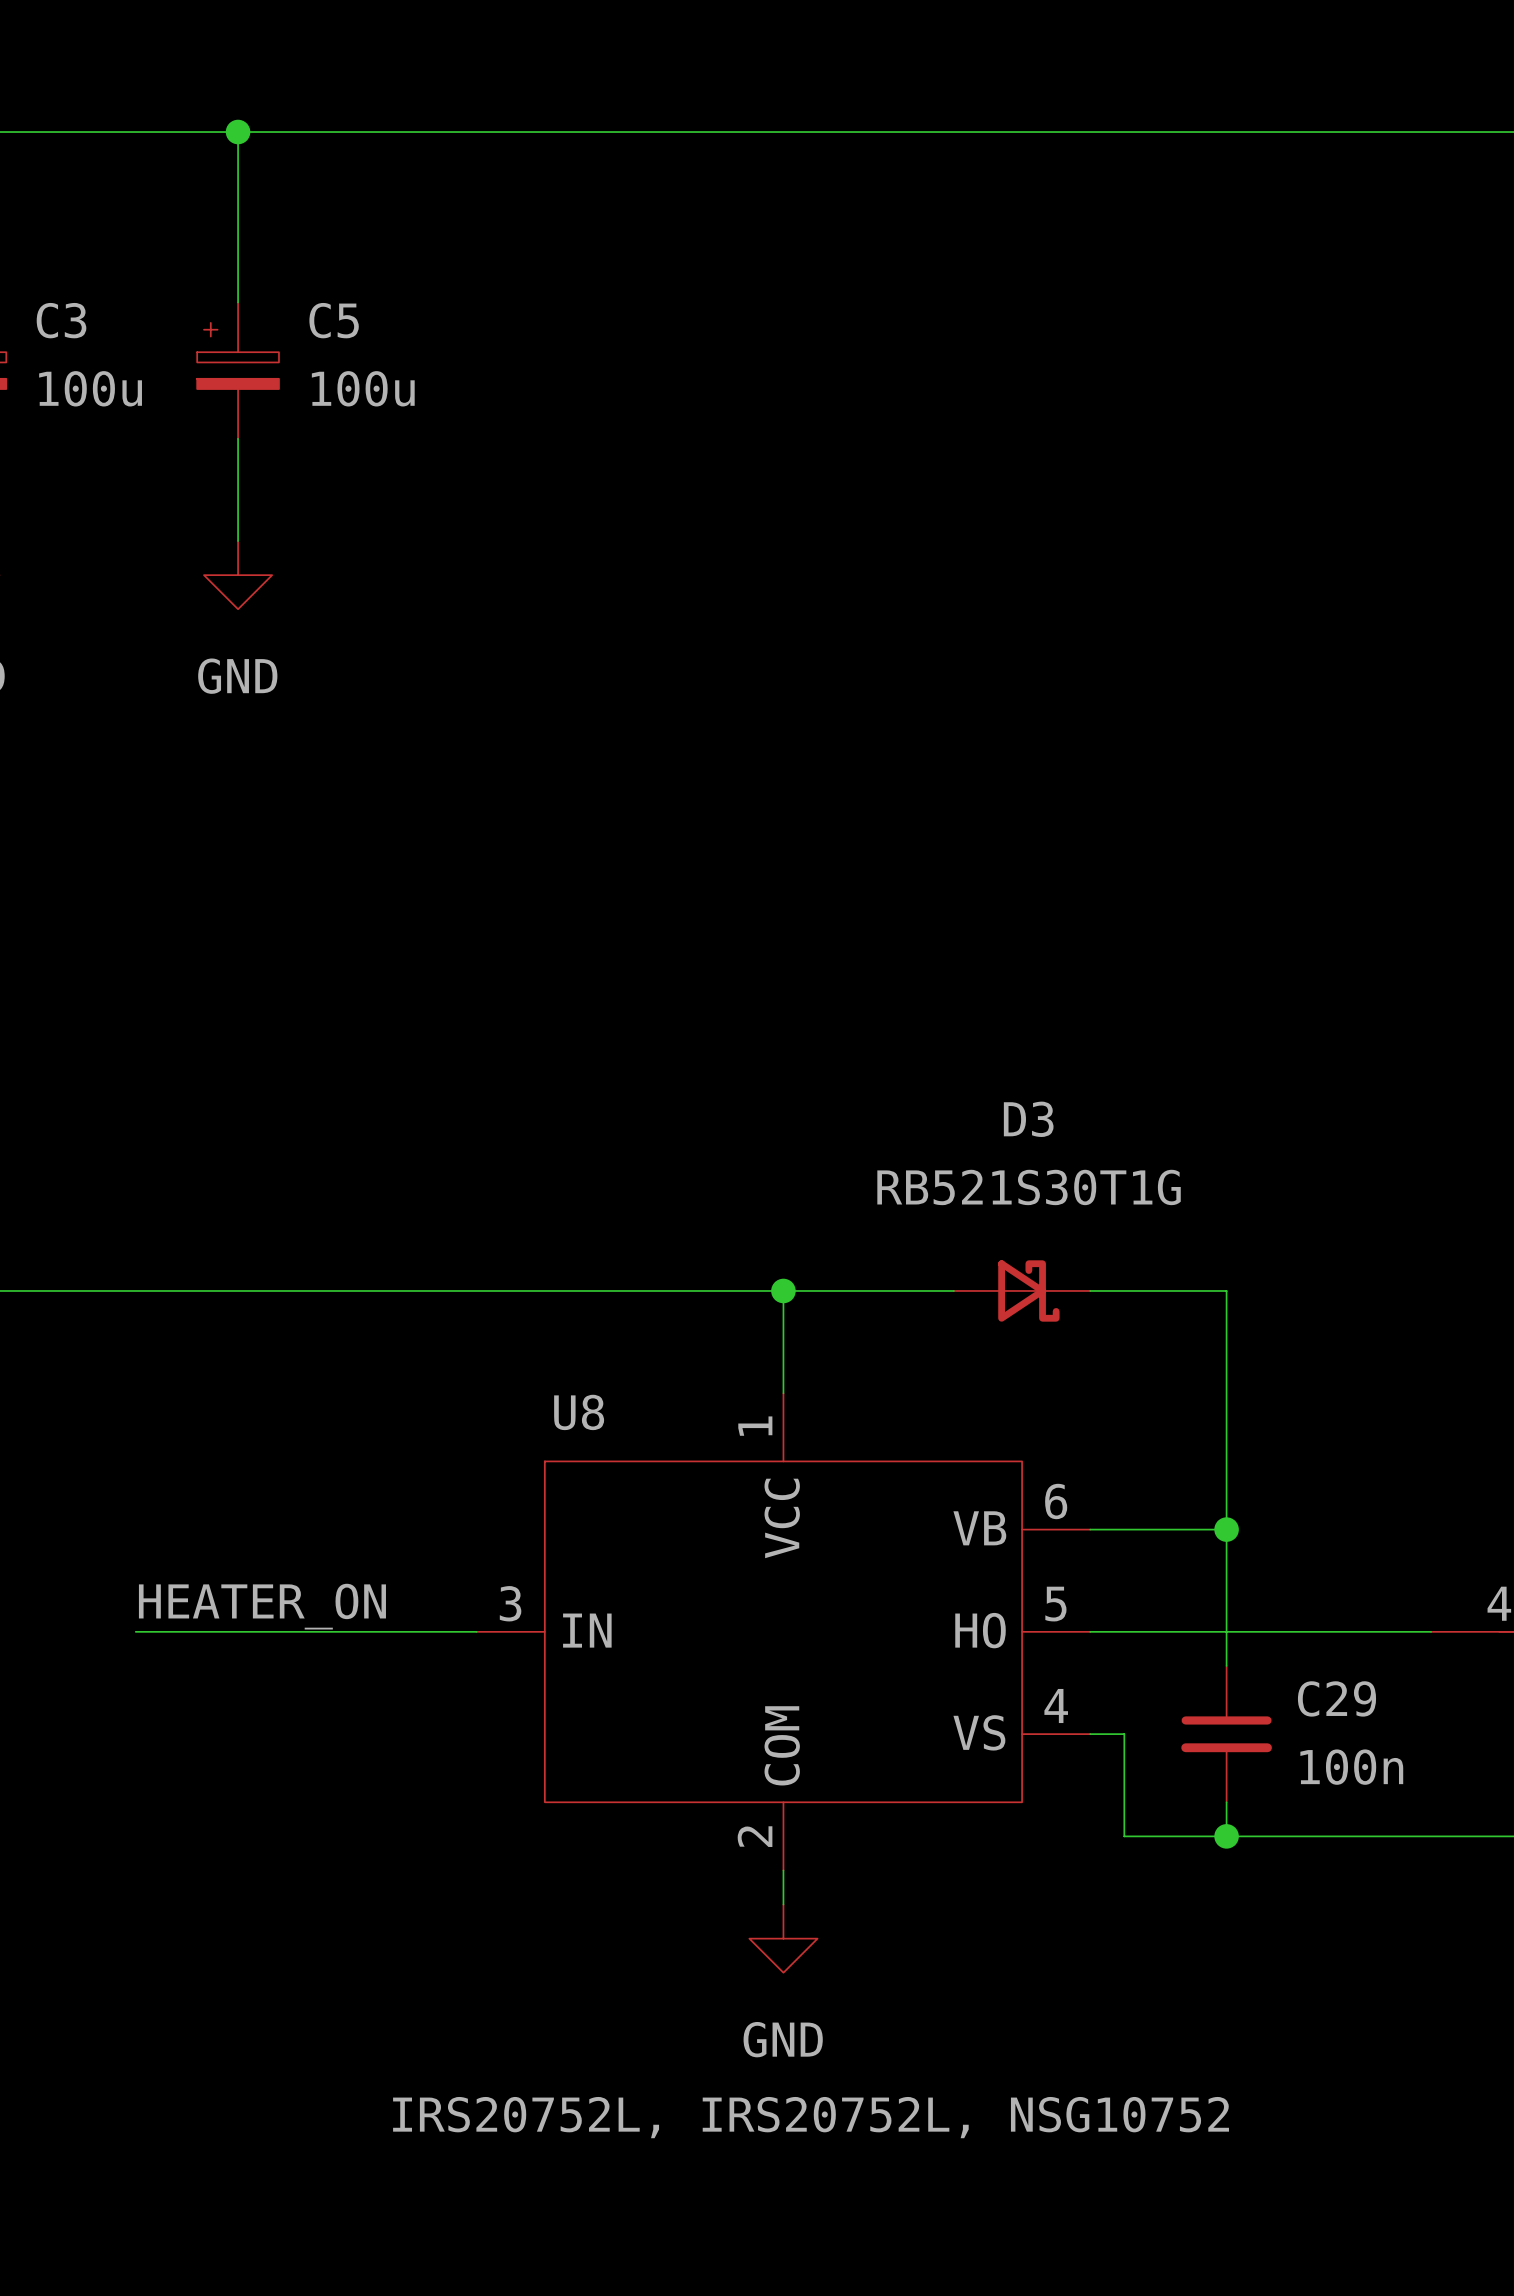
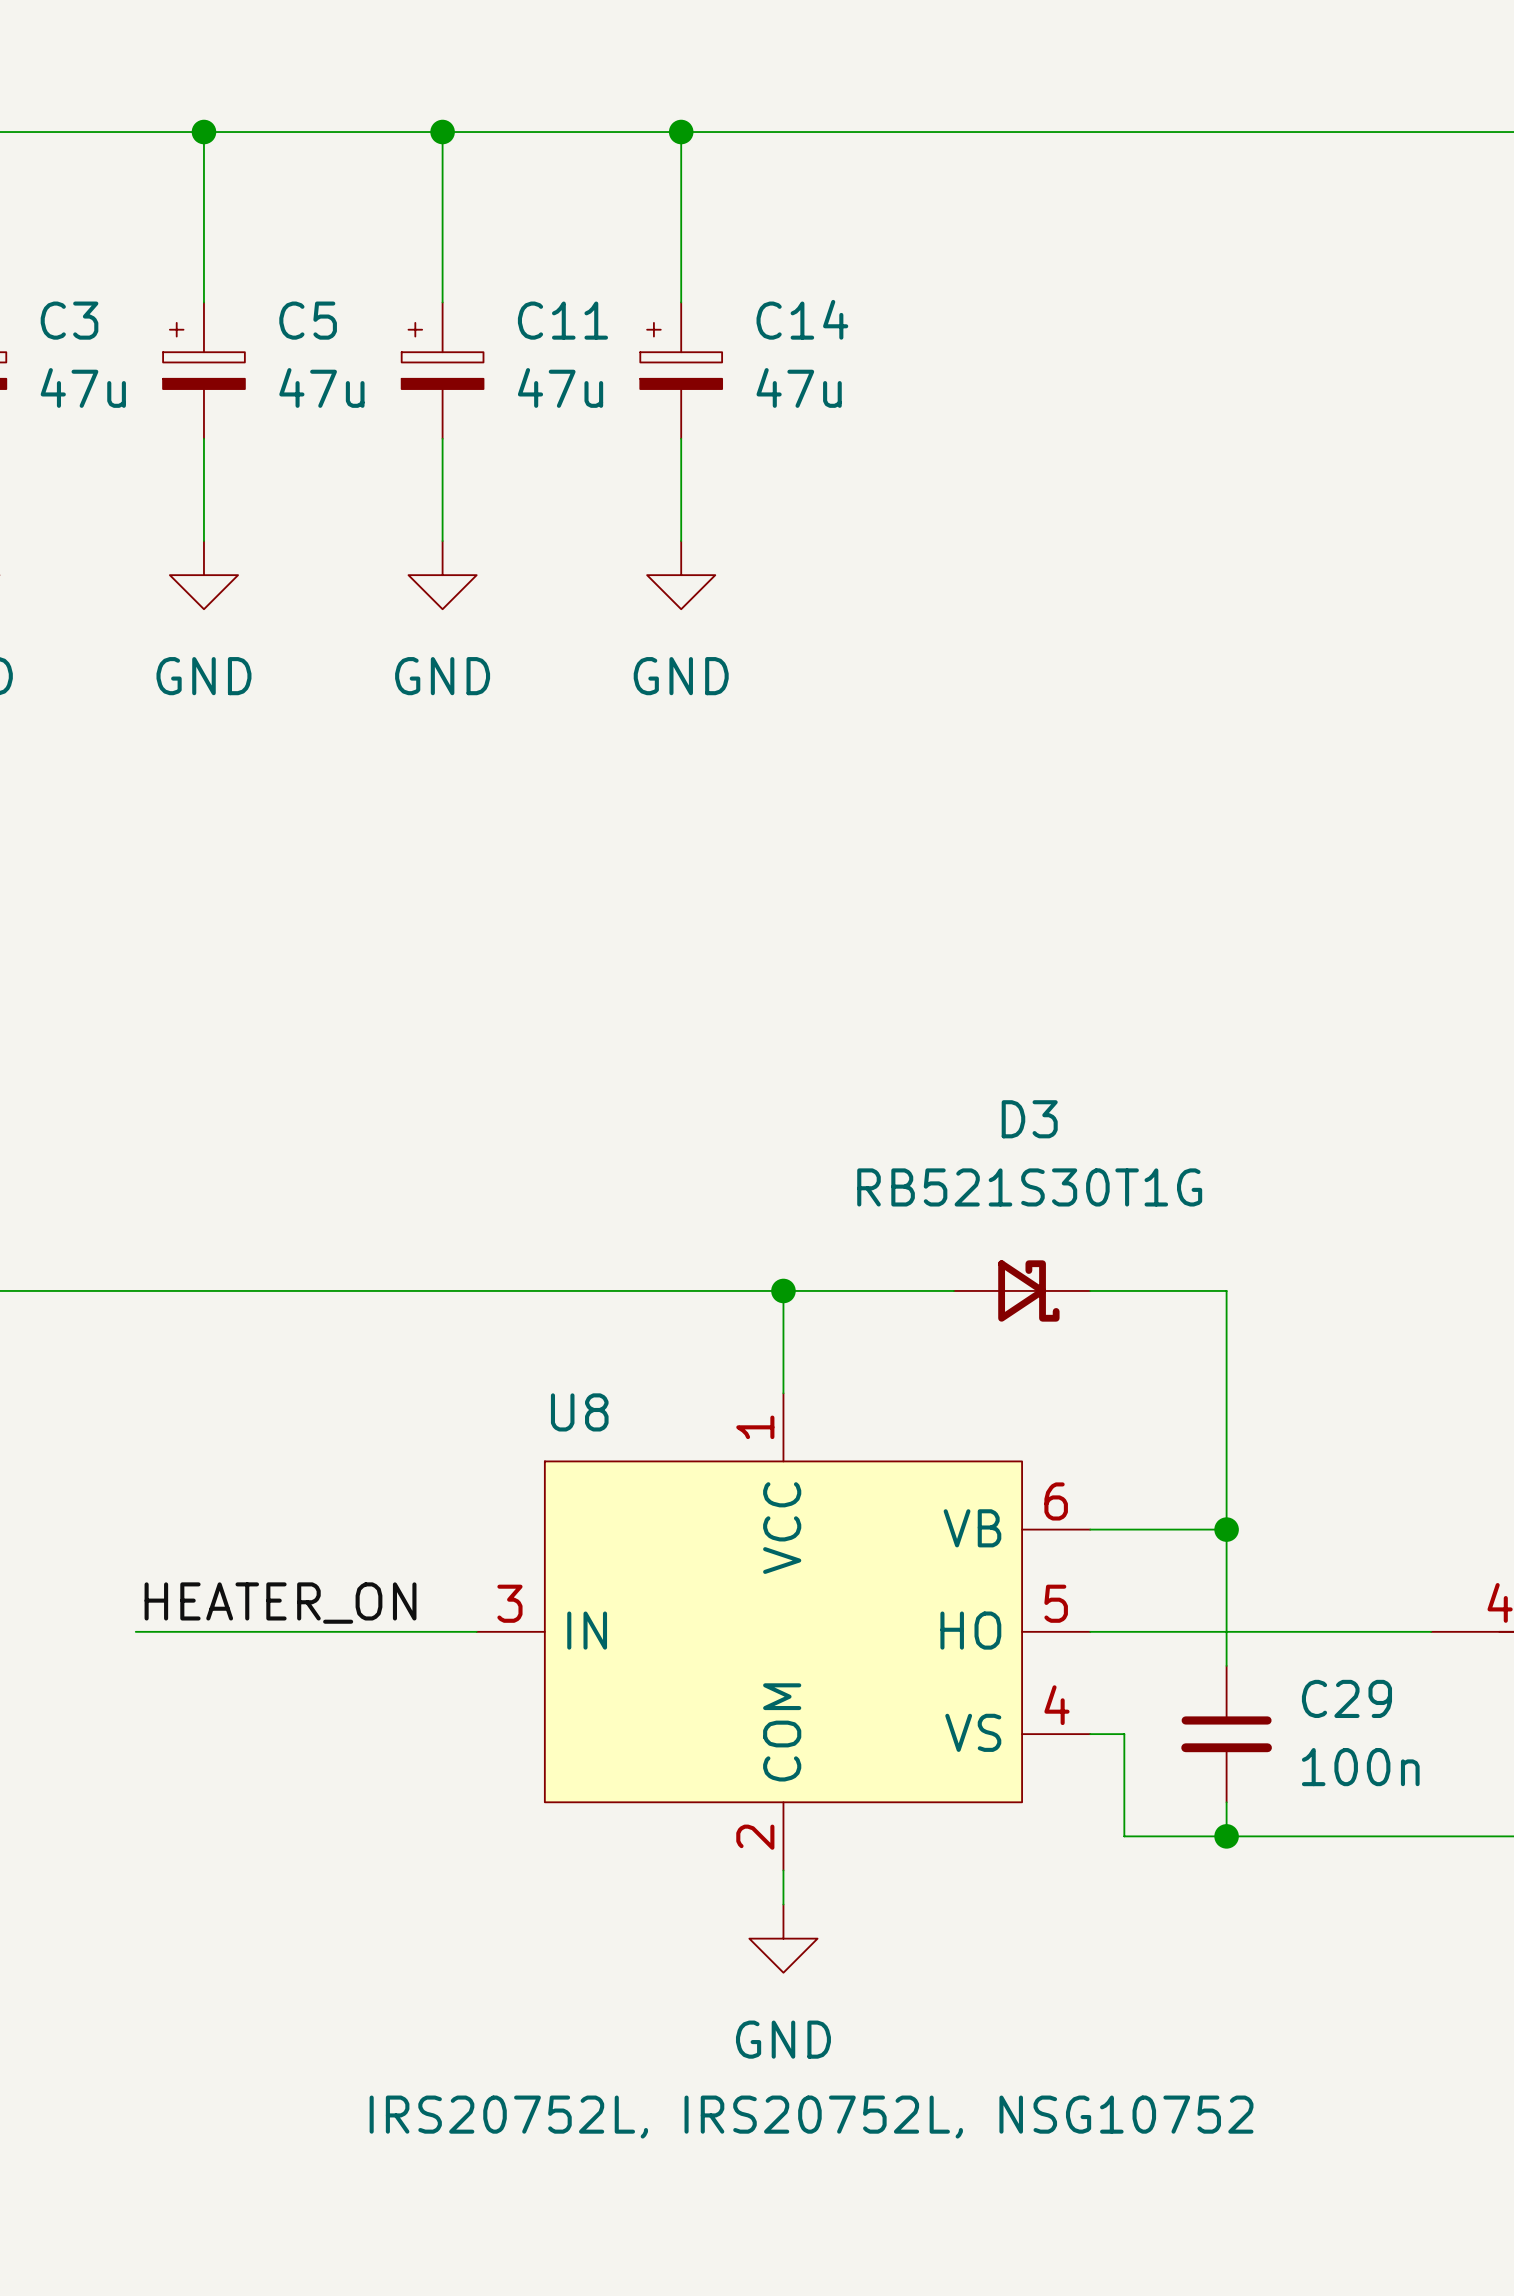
wire: (238, 132) (238, 302) -> (203, 132) (203, 302)
junction position: (238, 132) -> (203, 132)
wire: none -> (442, 132) (442, 302)
junction: none -> (442, 132)
wire: none -> (681, 132) (681, 302)
junction: none -> (681, 132)
C5 position: (238, 370) -> (203, 370)
C11: none -> 47u (442, 370)
C14: none -> 47u (681, 370)
C3 value: 100u (90, 388) -> 47u (83, 387)
C5 value: 100u (363, 388) -> 47u (321, 387)
wire: (238, 438) (238, 541) -> (203, 438) (203, 541)
wire: none -> (442, 438) (442, 541)
wire: none -> (681, 438) (681, 541)
power symbol position: GND (238, 575) -> GND (203, 575)
power symbol: none -> GND (442, 575)
power symbol: none -> GND (681, 575)

